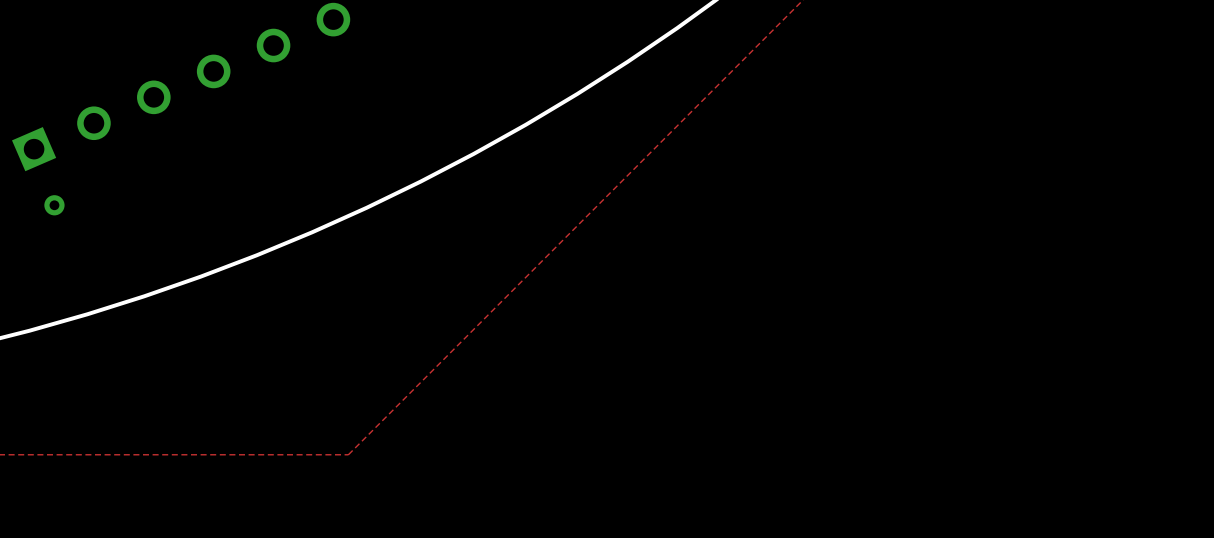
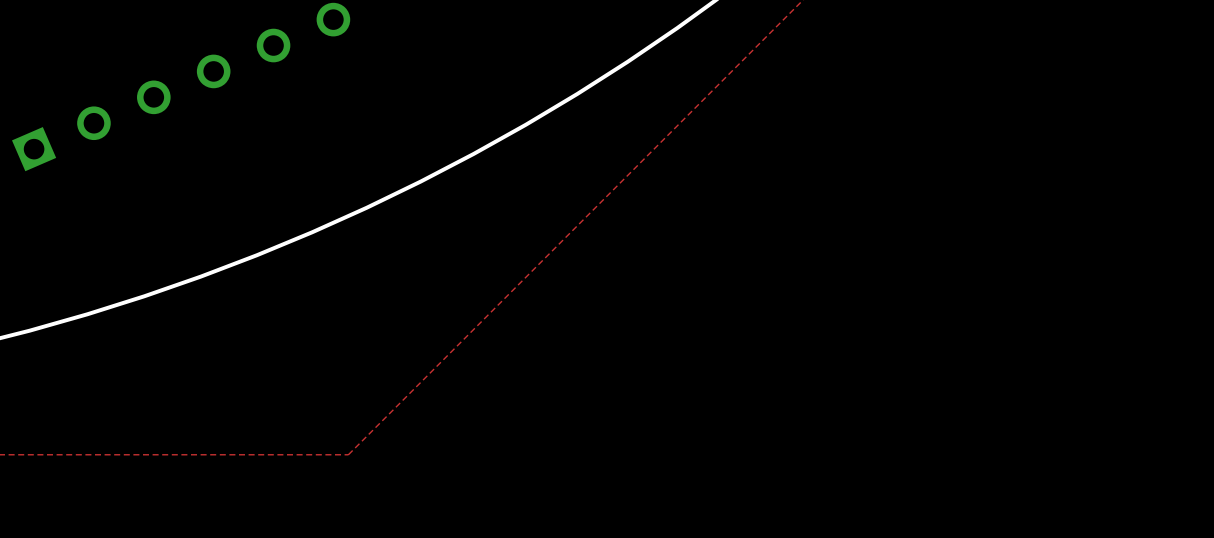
via: (54, 205) -> none

